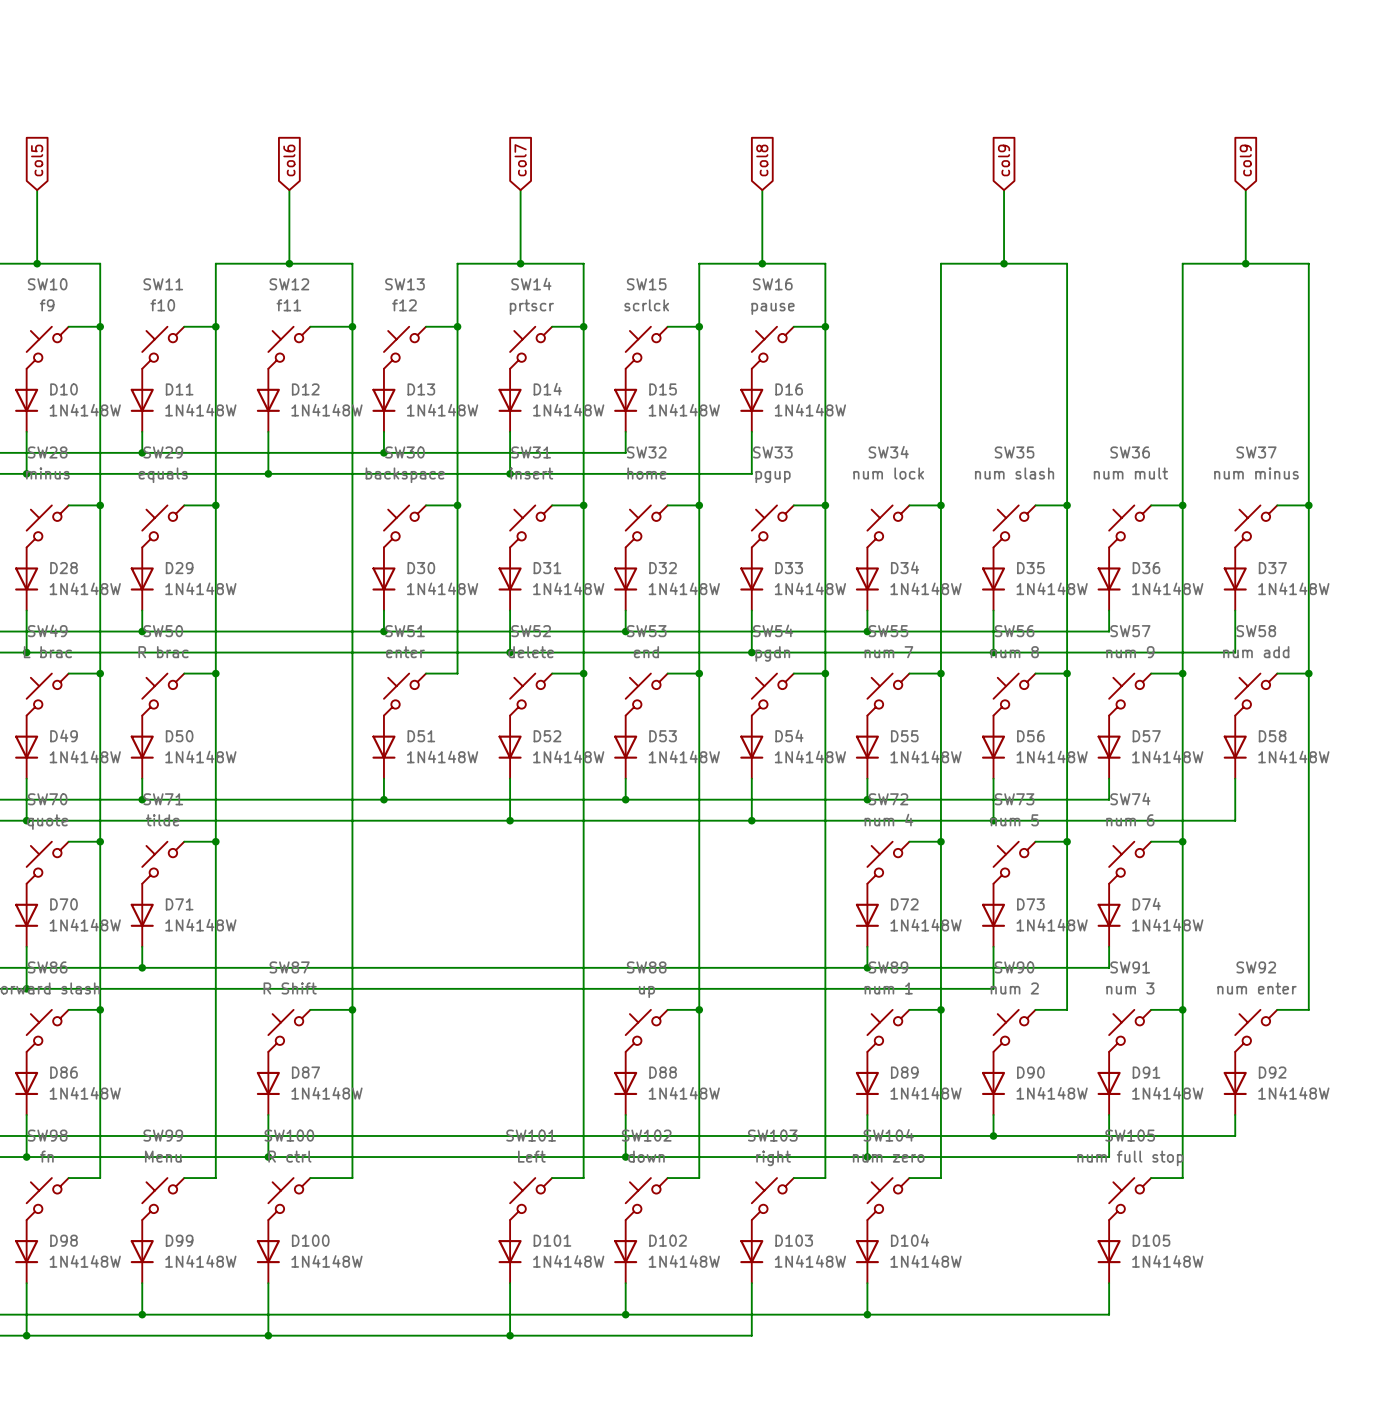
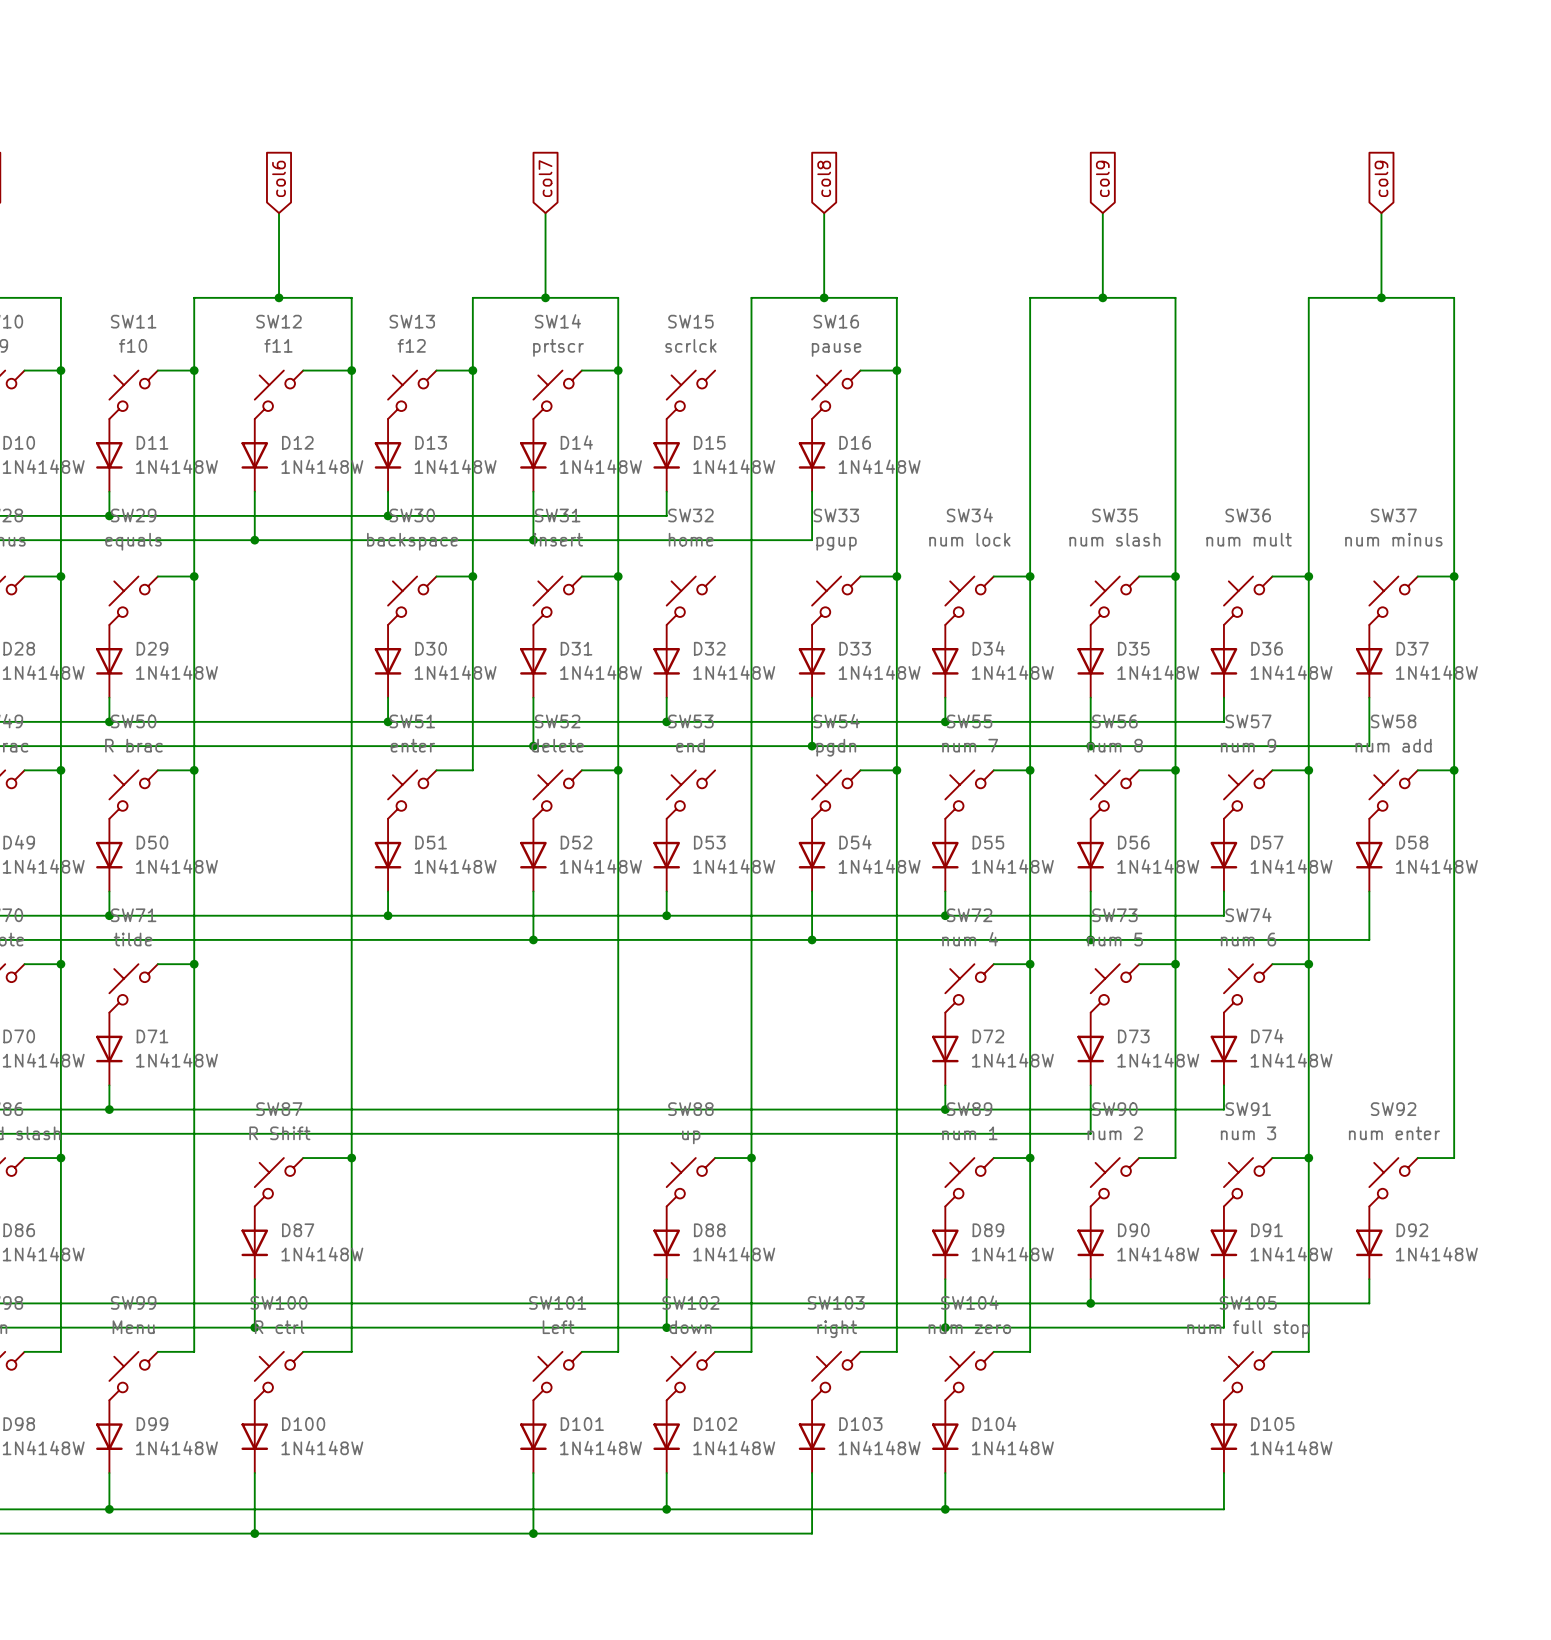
wire: (667, 326) (699, 326) -> none
junction: (699, 326) -> none
wire: (667, 505) (699, 505) -> none
junction: (699, 505) -> none
wire: (667, 673) (699, 673) -> none
junction: (699, 673) -> none

